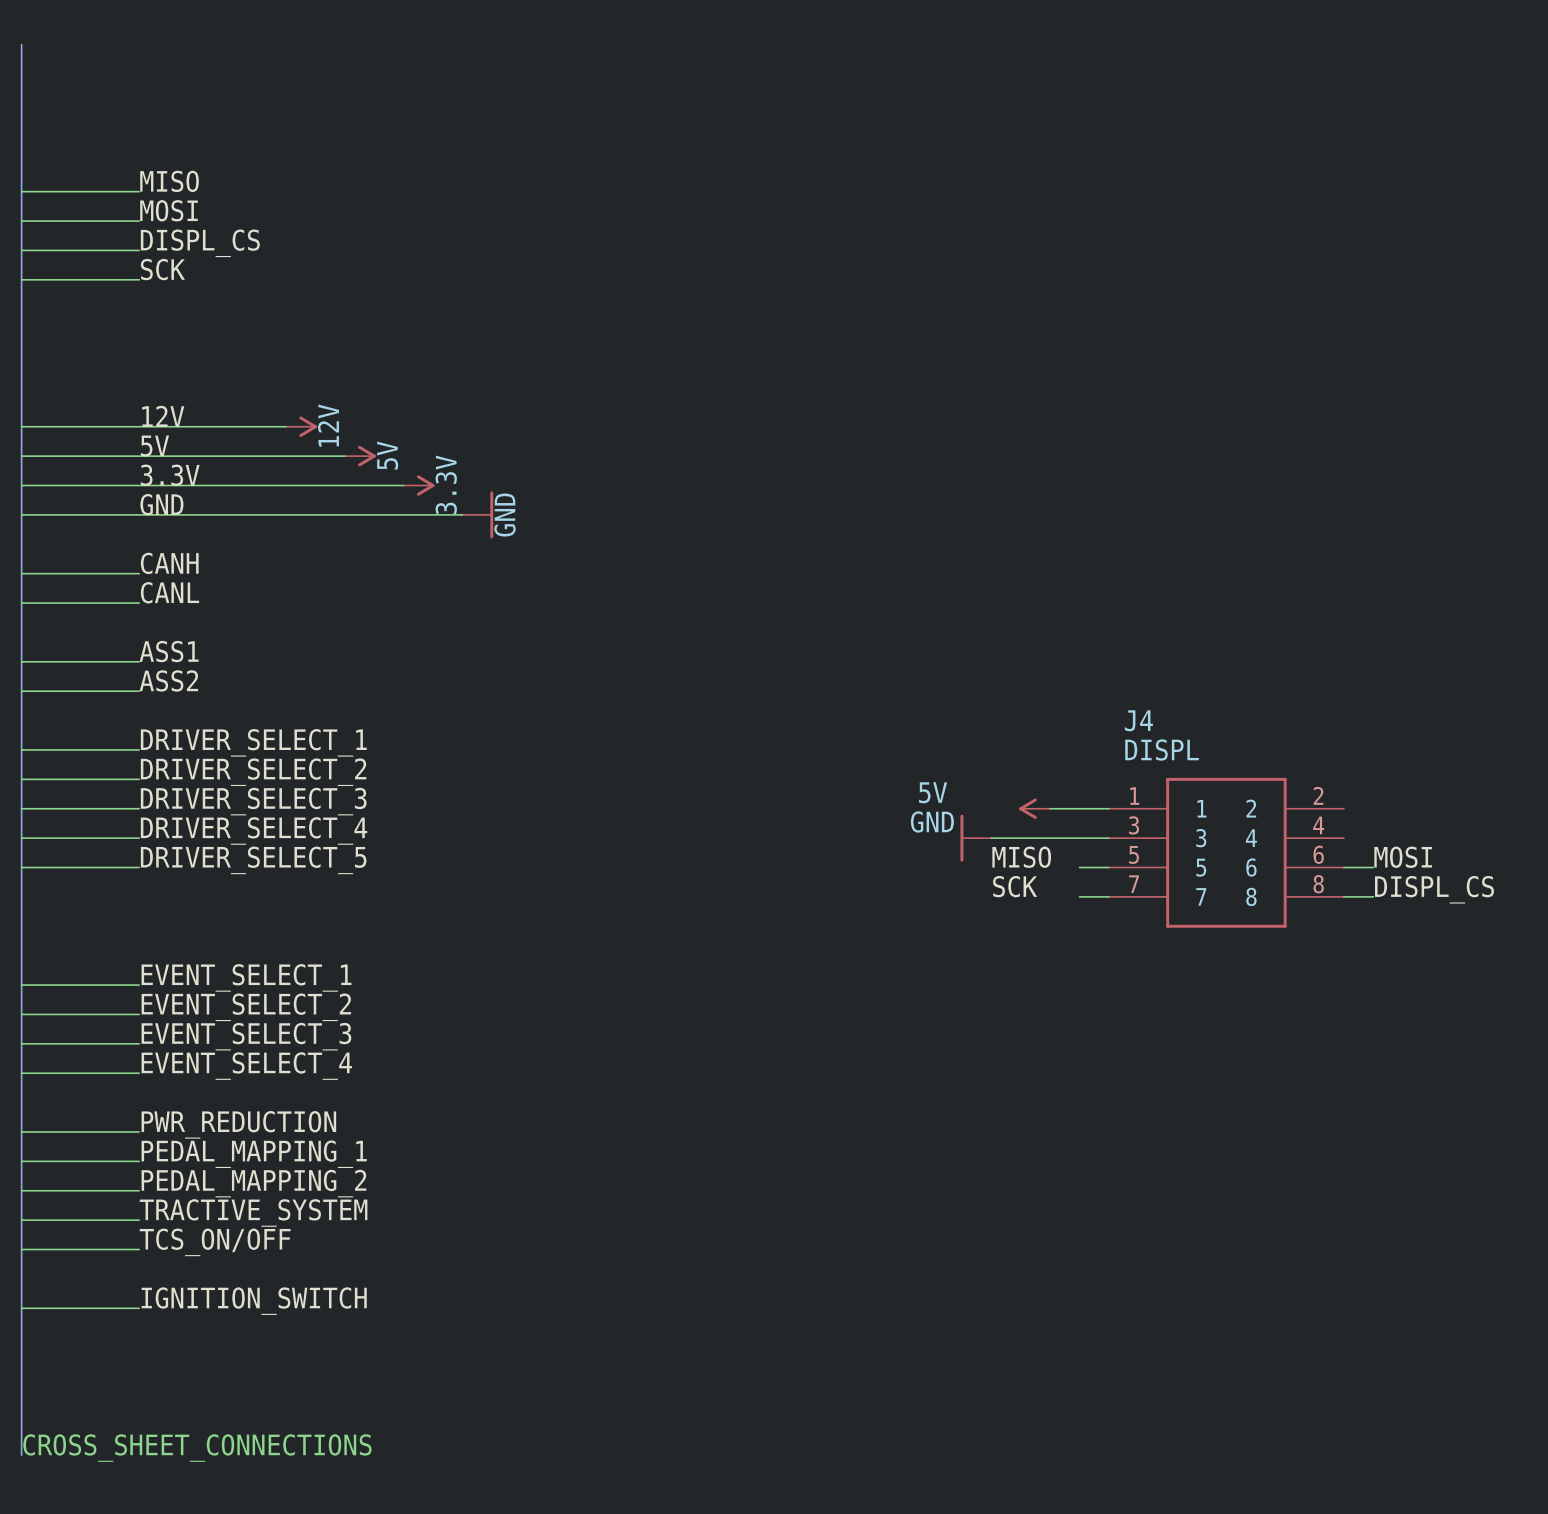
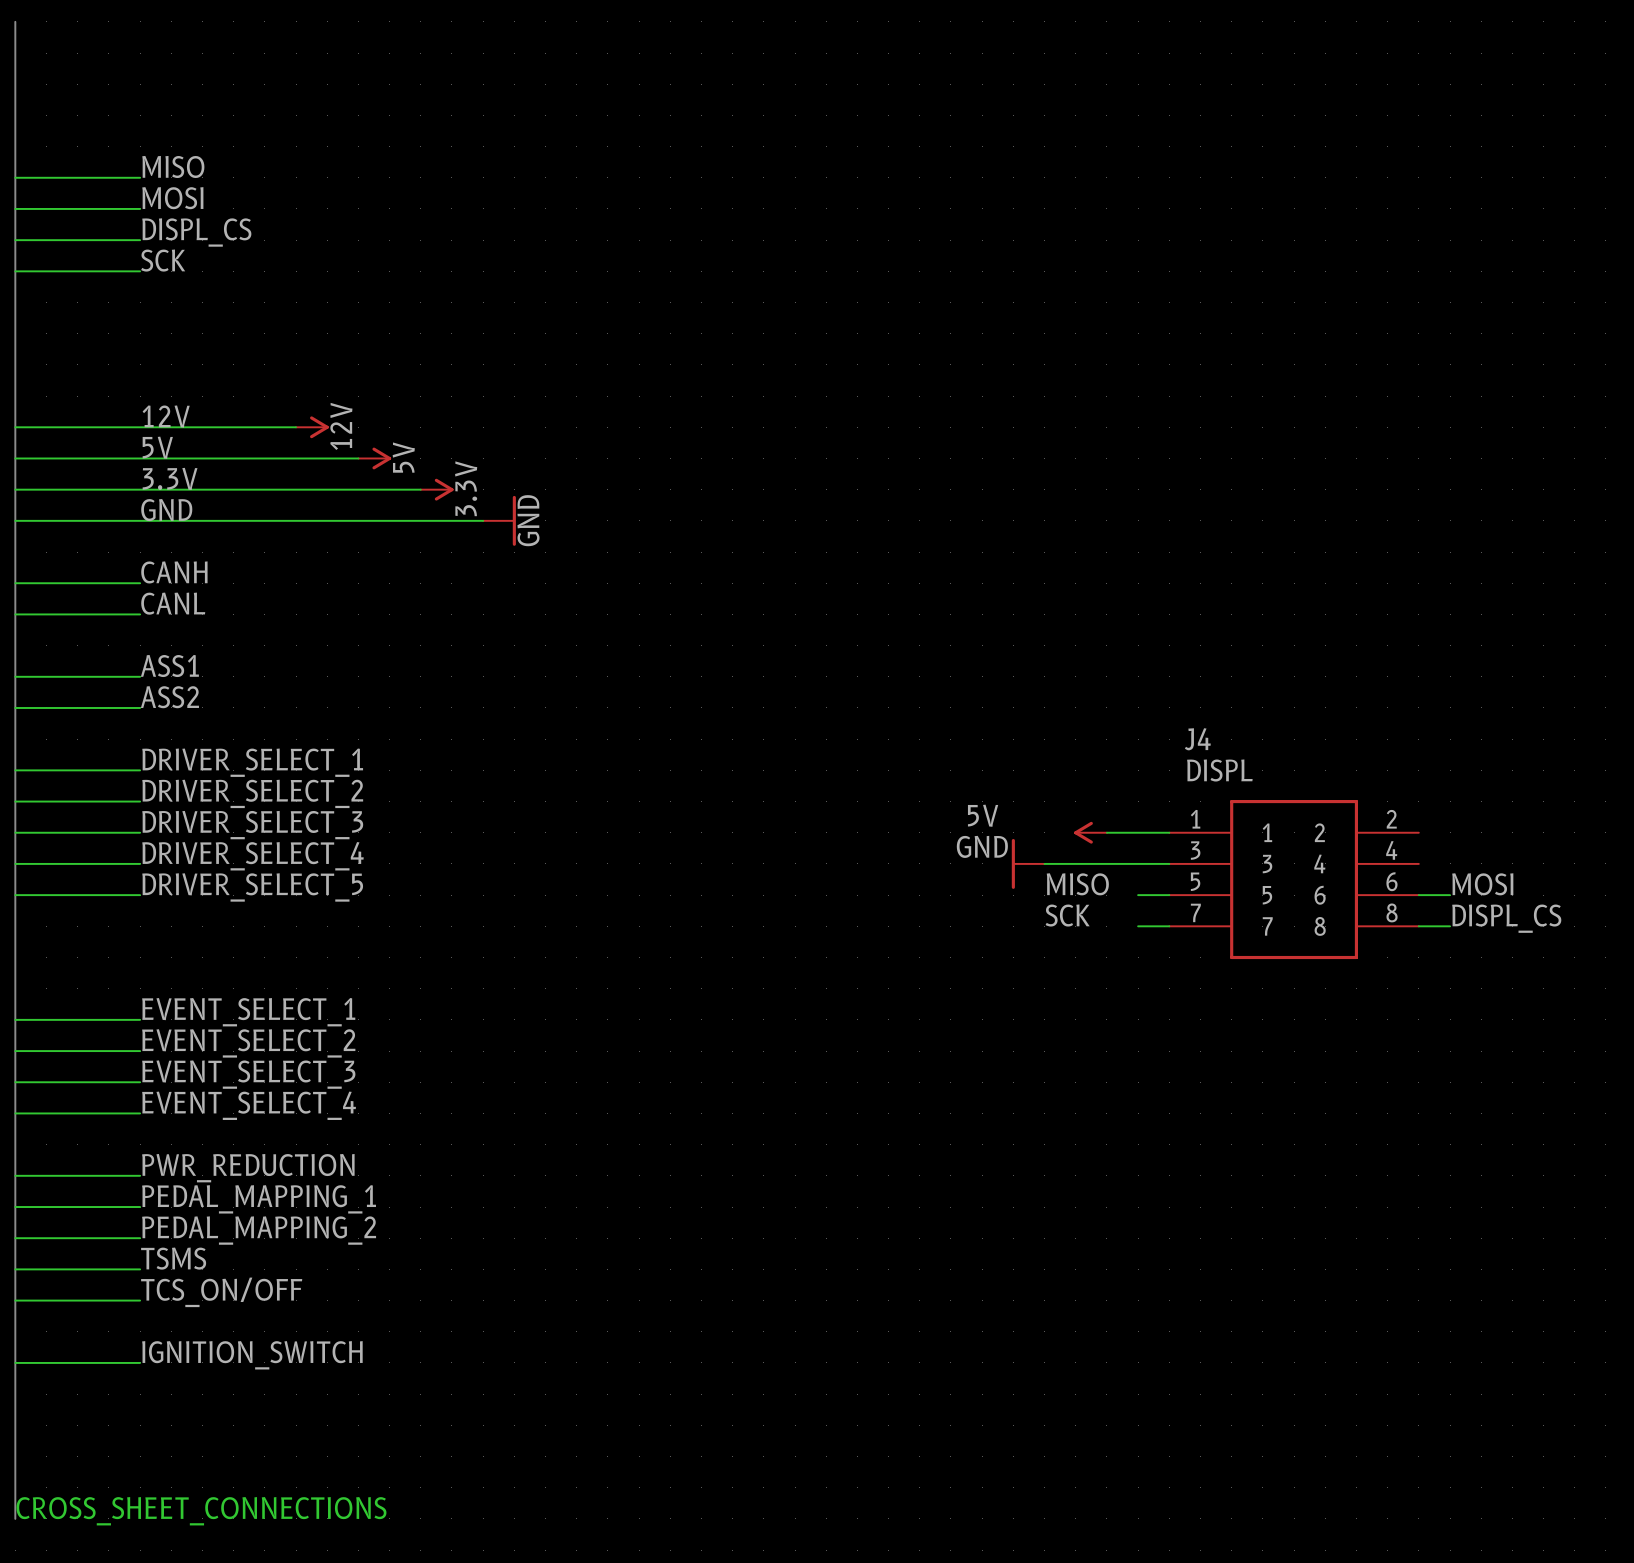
label: TRACTIVE_SYSTEM (253, 1212) -> TSMS (173, 1258)

